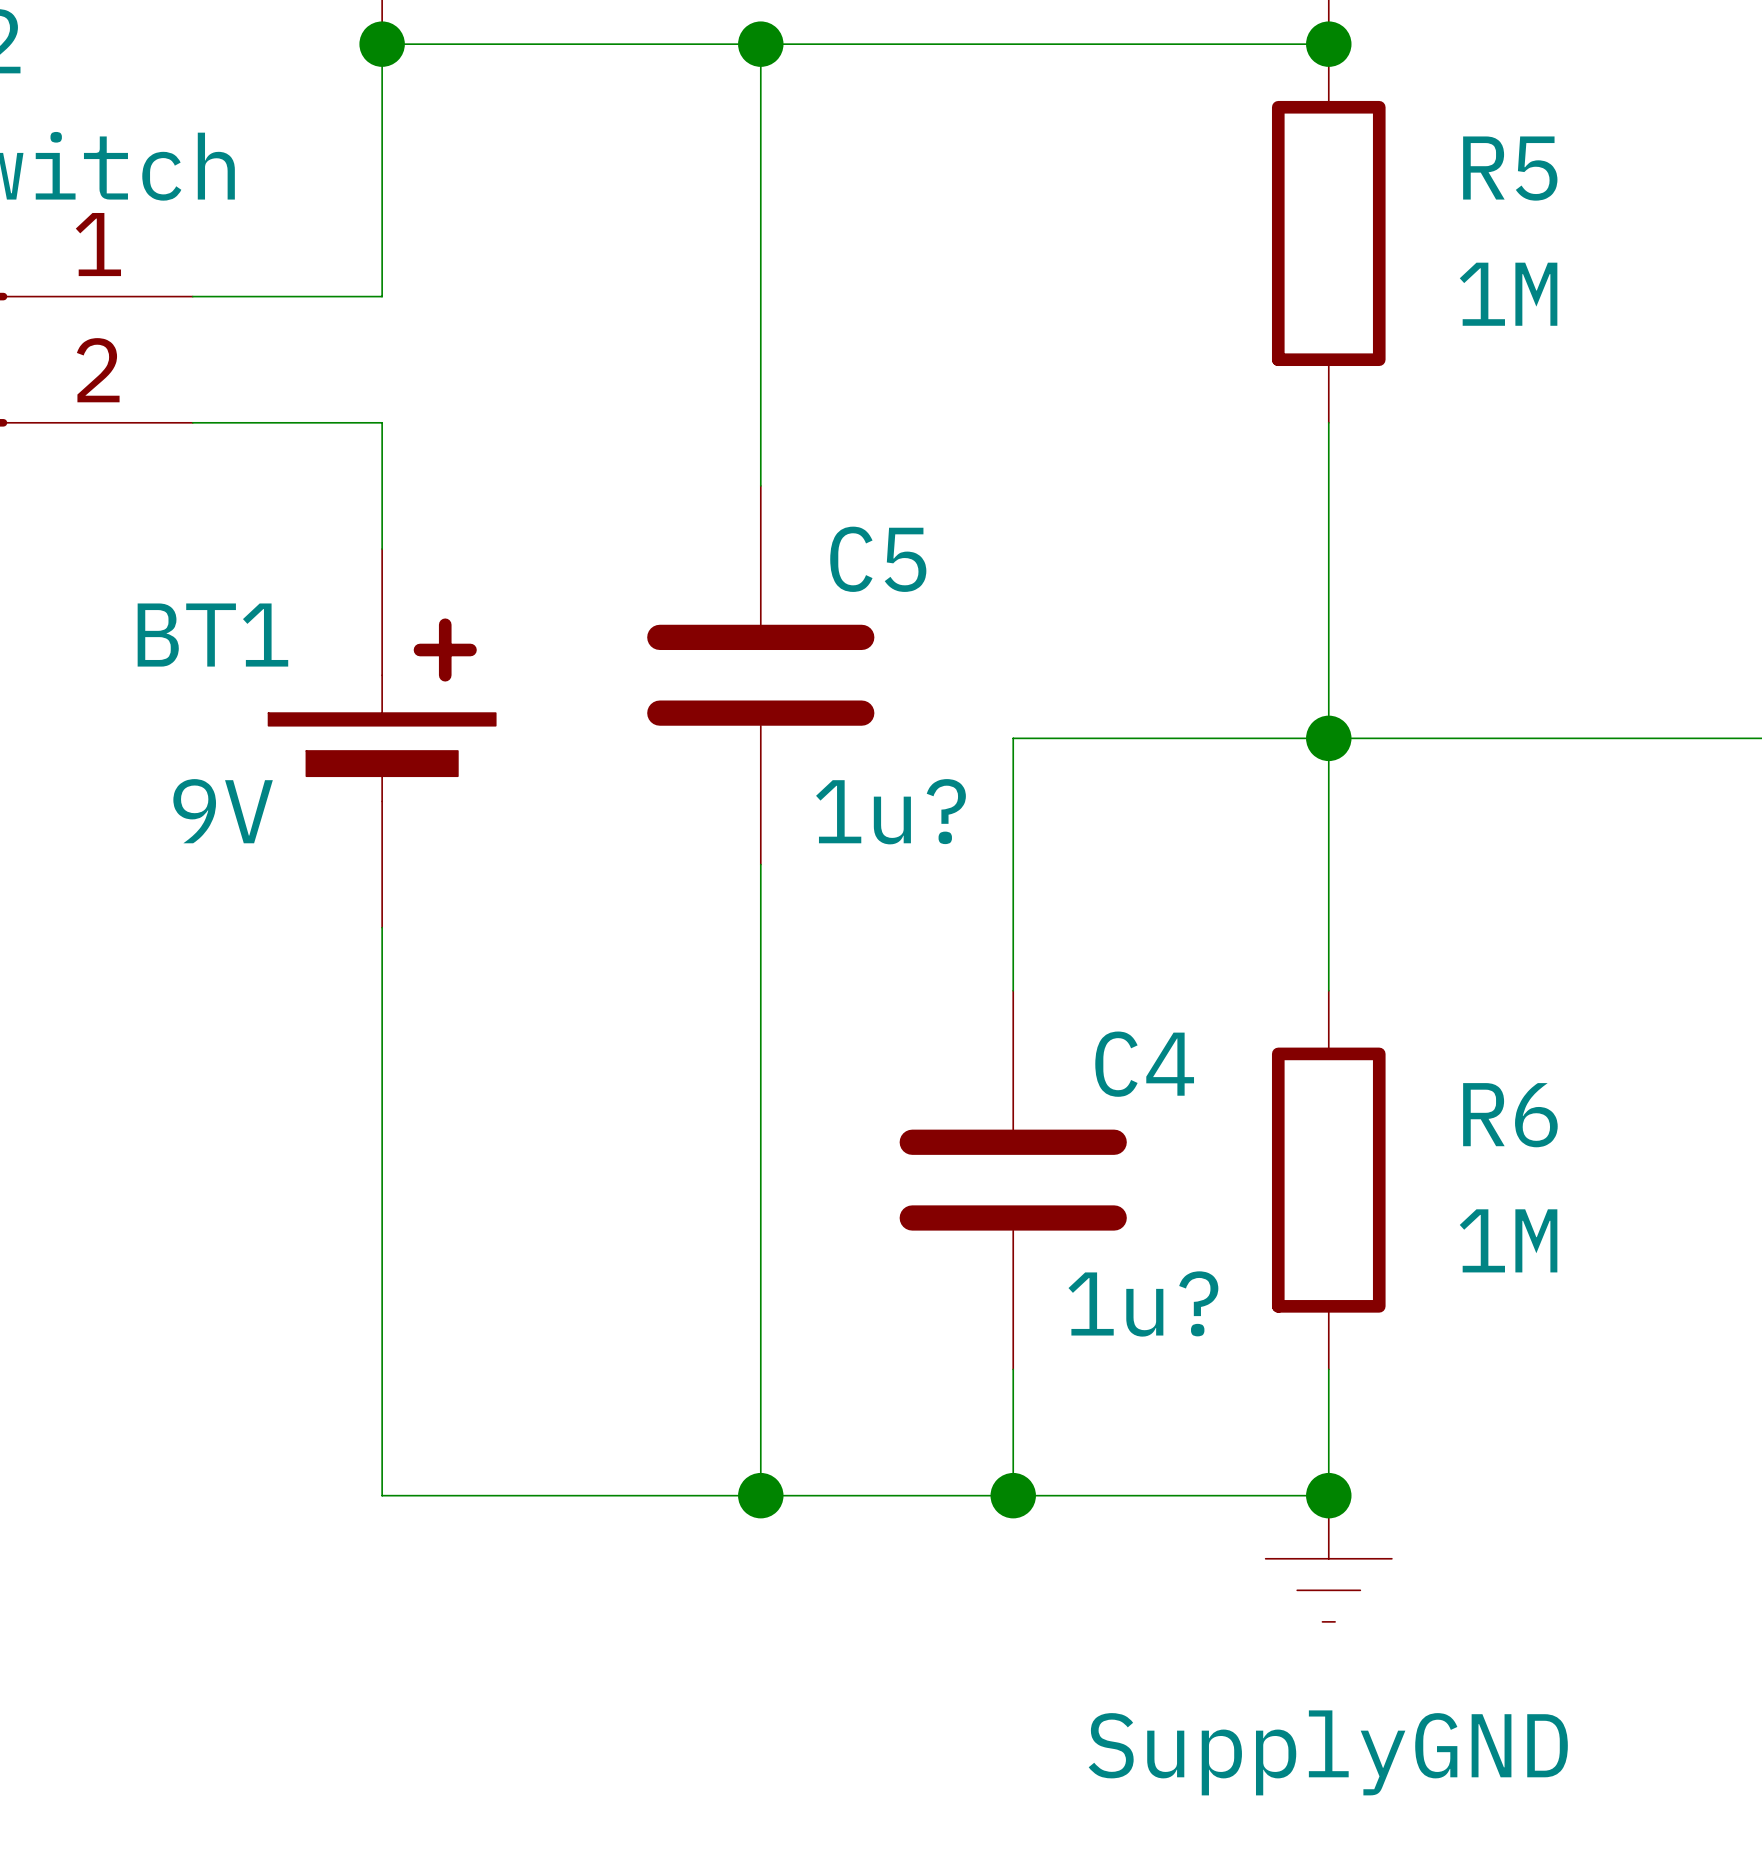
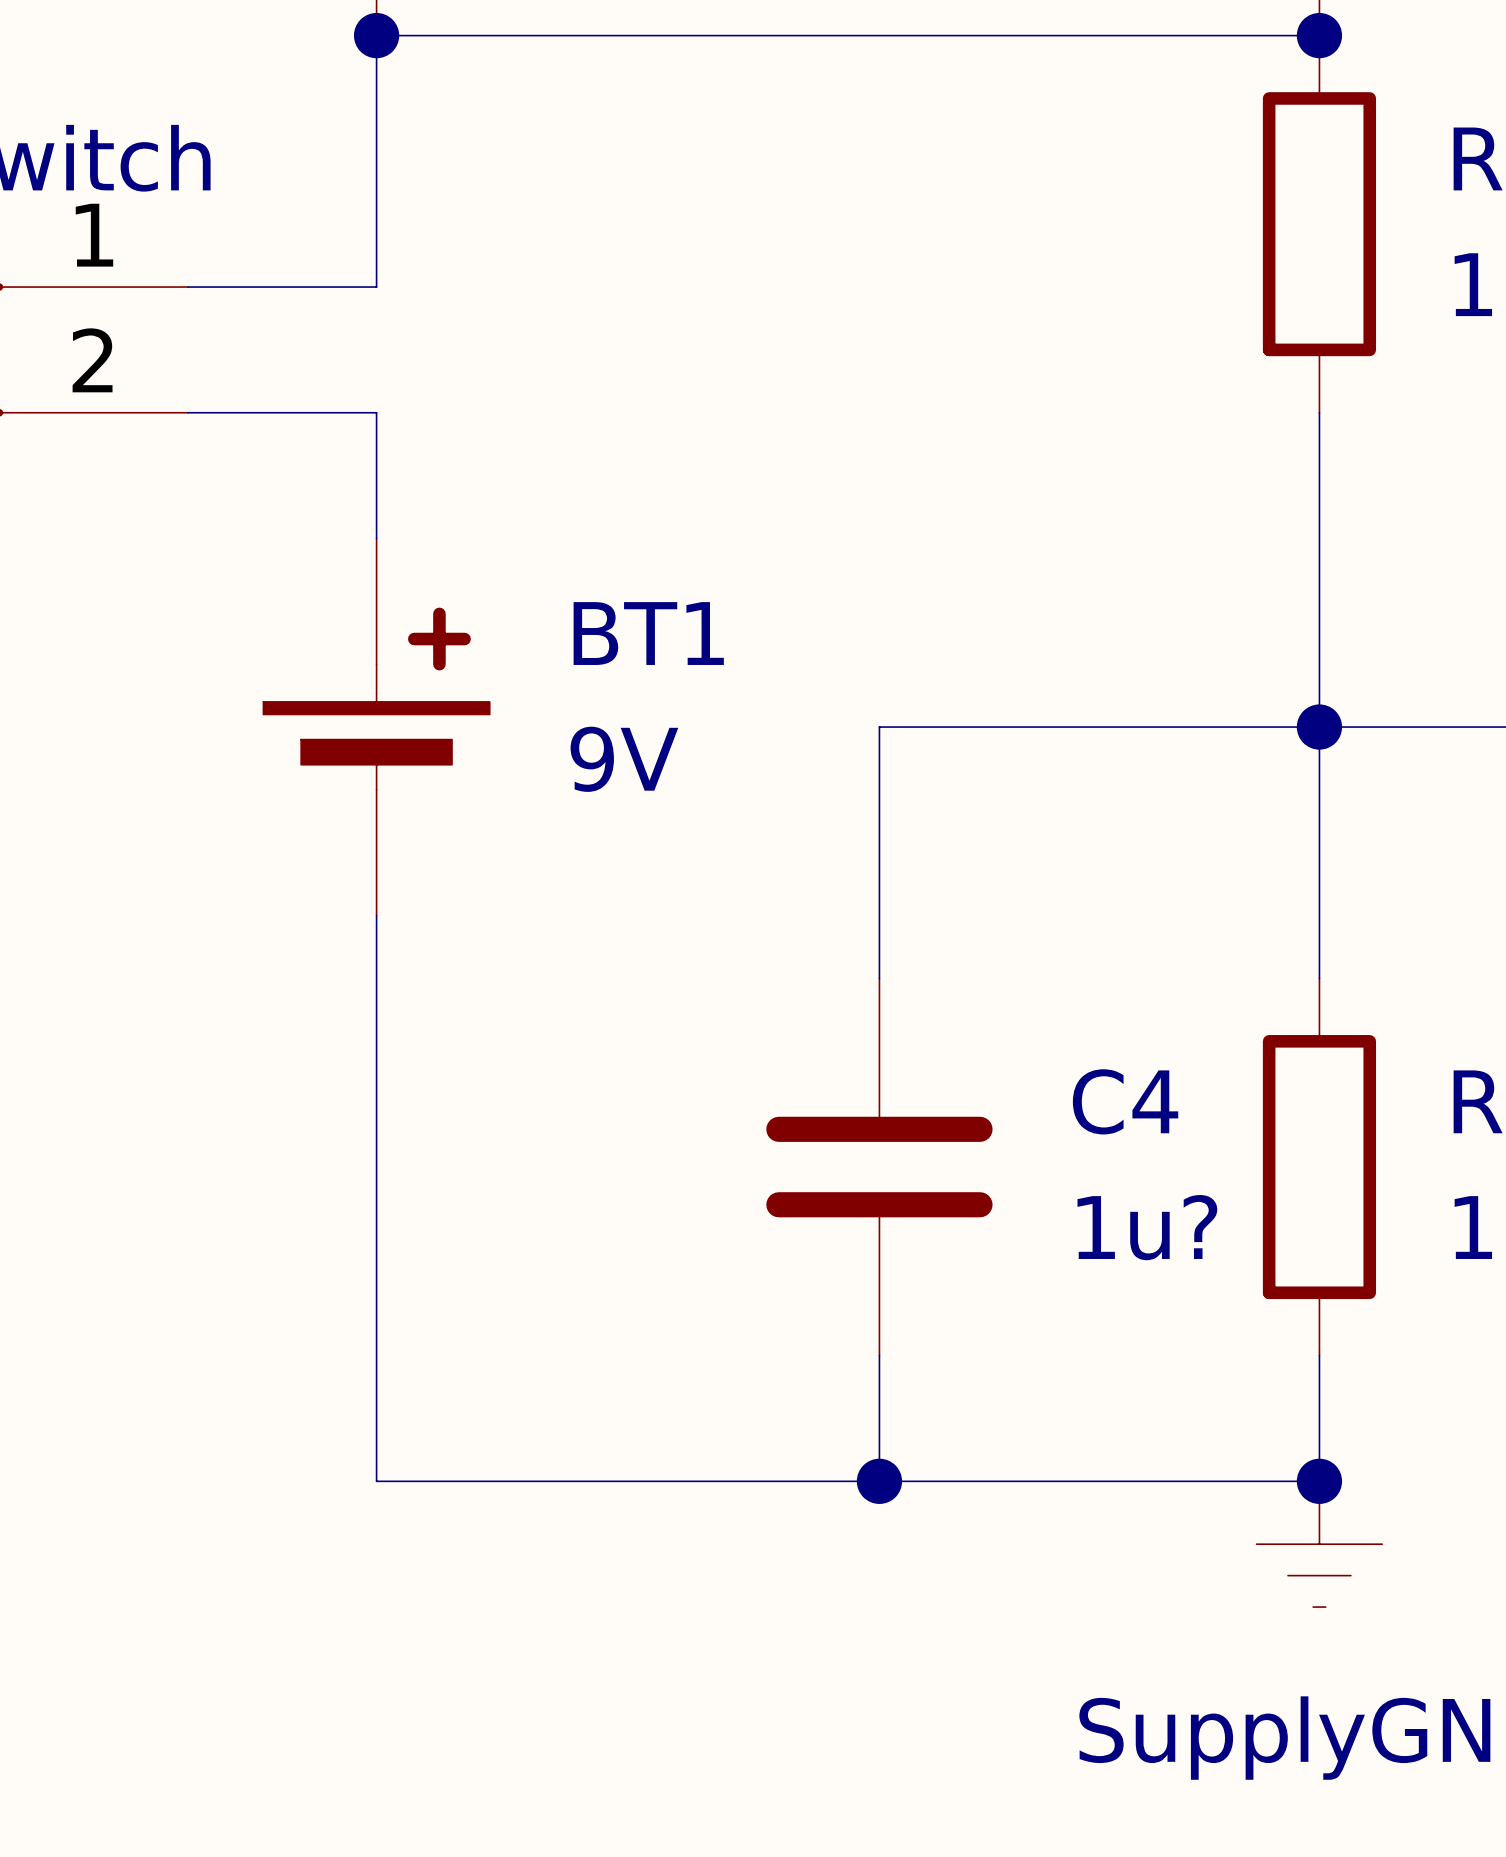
wire: (760, 44) (760, 485) -> none
junction: (760, 44) -> none
BT1 name position: BT1 (212, 635) -> BT1 (648, 633)
C5: 1u? (760, 675) -> none
wire: (1013, 738) (1013, 990) -> (1005, 727) (879, 727) (879, 978)
BT1 value position: 9V (223, 811) -> 9V (624, 759)
wire: (760, 864) (760, 1495) -> none
C4 name position: C4 (1144, 1064) -> C4 (1125, 1101)
C4 position: (1013, 1180) -> (879, 1167)
C4 value position: 1u? (1143, 1303) -> 1u? (1147, 1227)
wire: (1013, 1369) (1013, 1495) -> (879, 1355) (879, 1481)
junction: (760, 1495) -> none
junction: none -> (879, 1481)
junction: (1013, 1495) -> none

